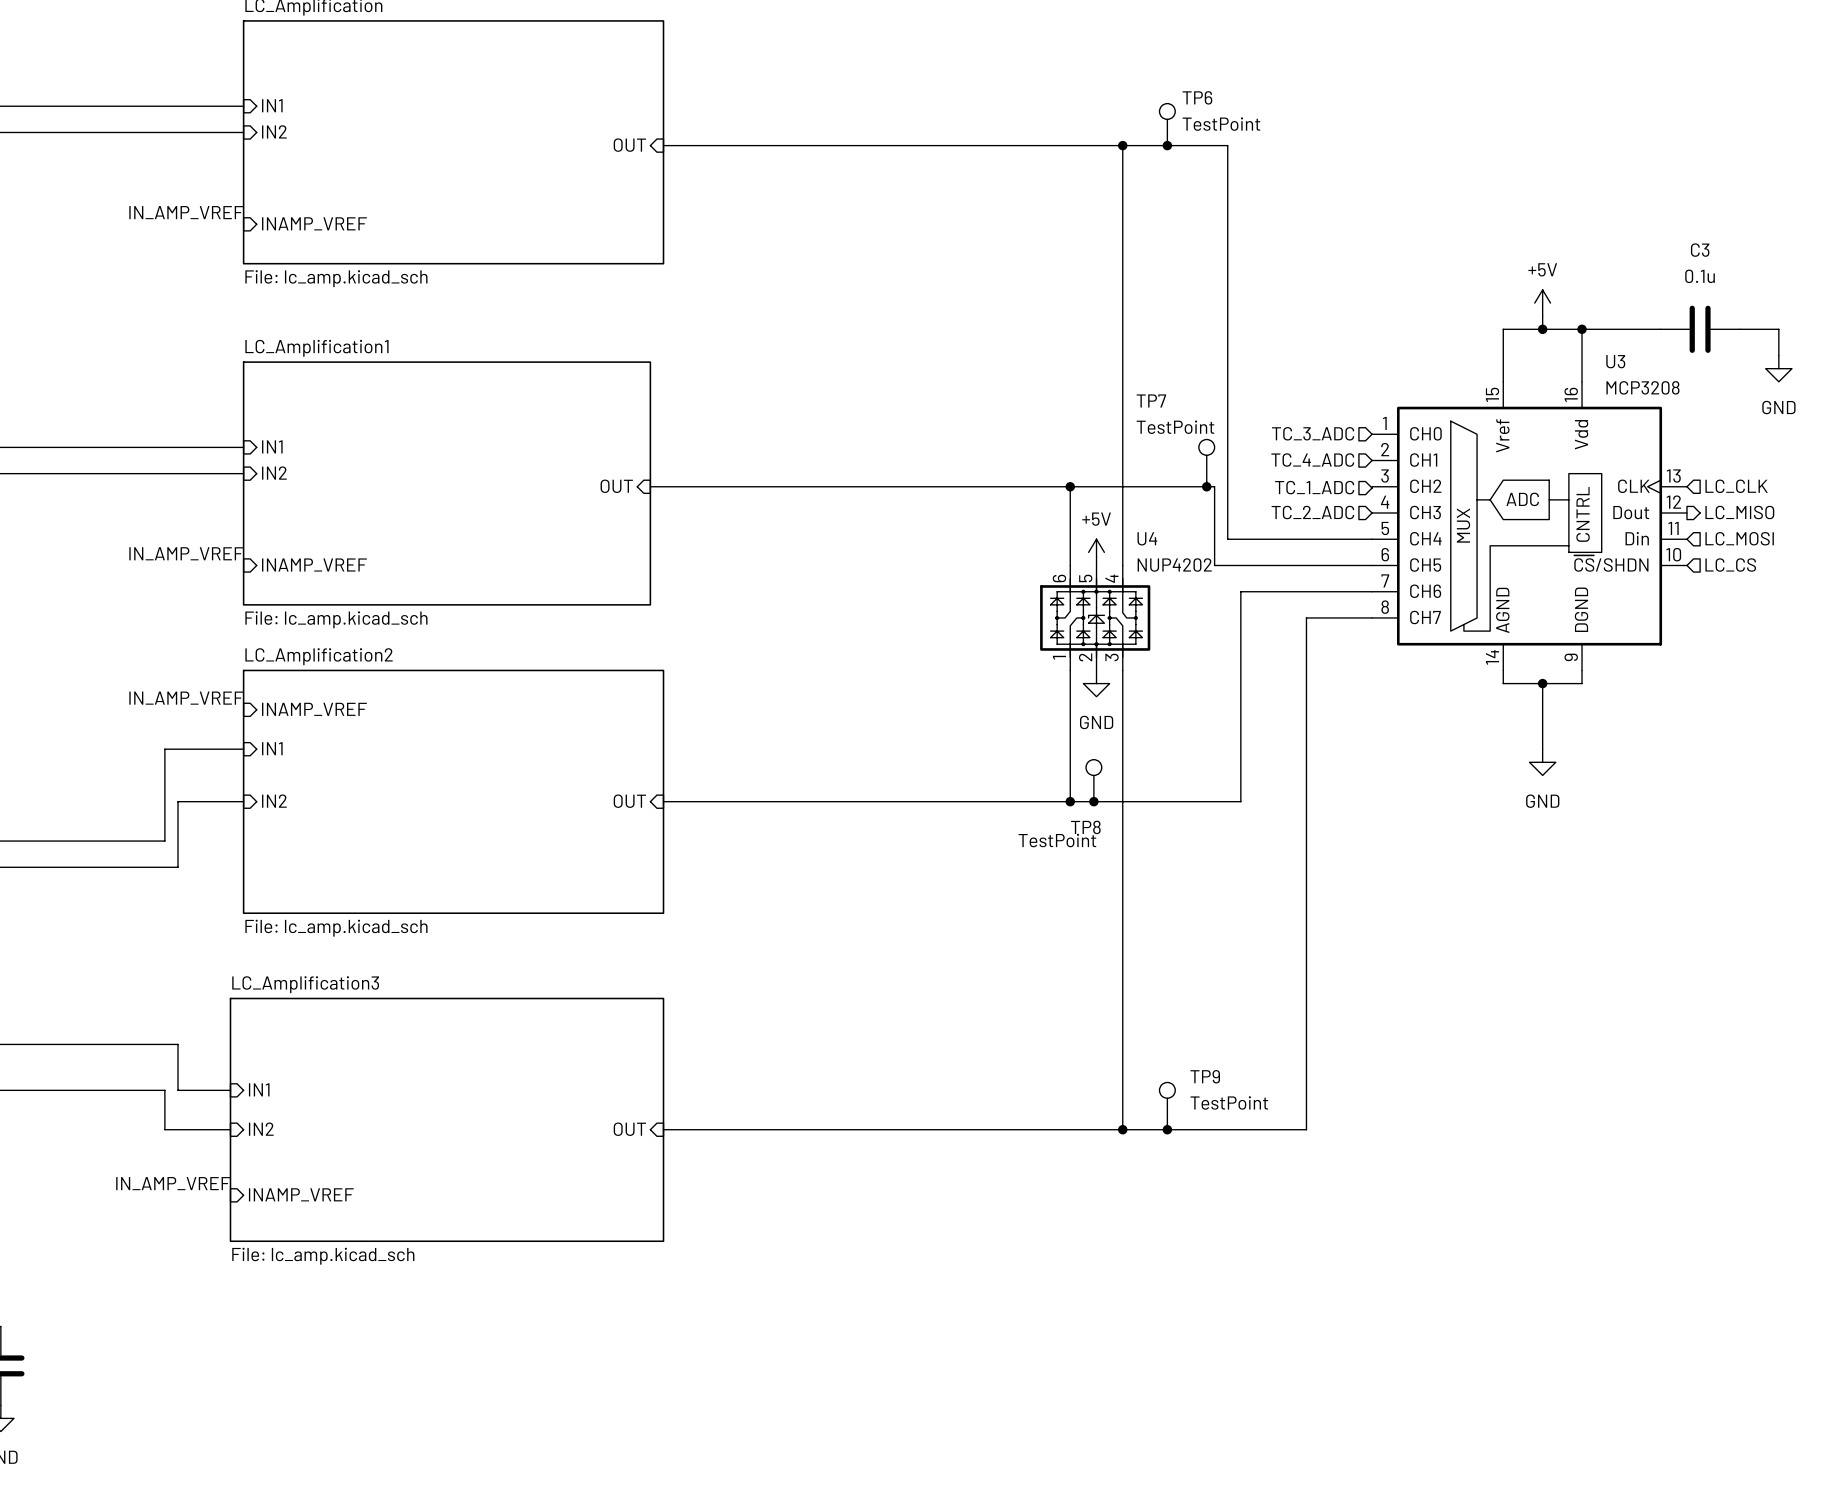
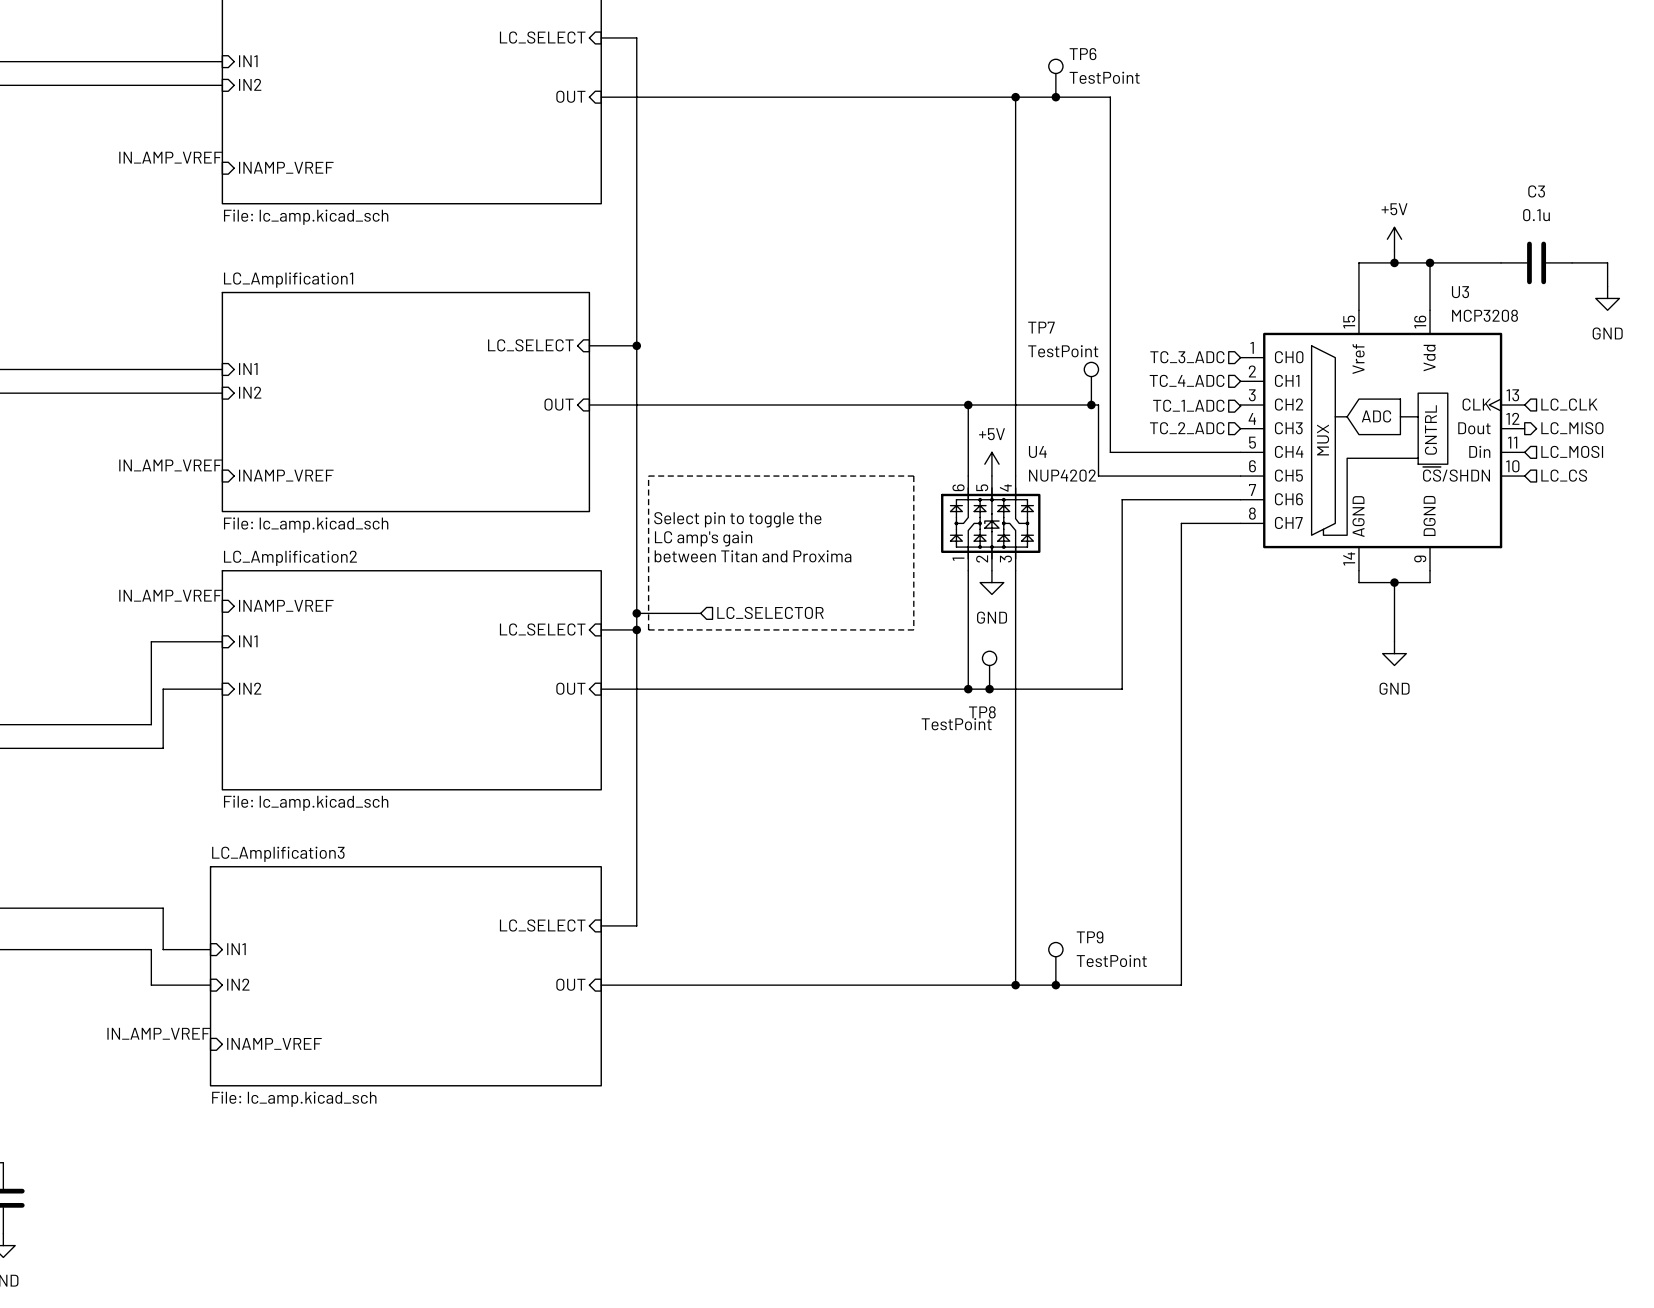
sheet pin: none -> LC_SELECT (542, 37)
wire: none -> (601, 37) (636, 37) (636, 925) (601, 925)
sheet pin: none -> LC_SELECT (530, 345)
wire: none -> (589, 345) (636, 345)
junction: none -> (636, 345)
line: none -> (648, 476) (913, 476) (913, 629) (648, 629) (648, 476)
text: none -> Select pin to toggle the (737, 519)
text: none -> LC amp's gain (703, 538)
text: none -> between Titan and Proxima (753, 556)
wire: none -> (636, 613) (700, 613)
junction: none -> (636, 613)
hierarchical label: none -> LC_SELECTOR (770, 612)
sheet pin: none -> LC_SELECT (542, 629)
wire: none -> (601, 629) (636, 629)
junction: none -> (636, 629)
sheet pin: none -> LC_SELECT (542, 925)

